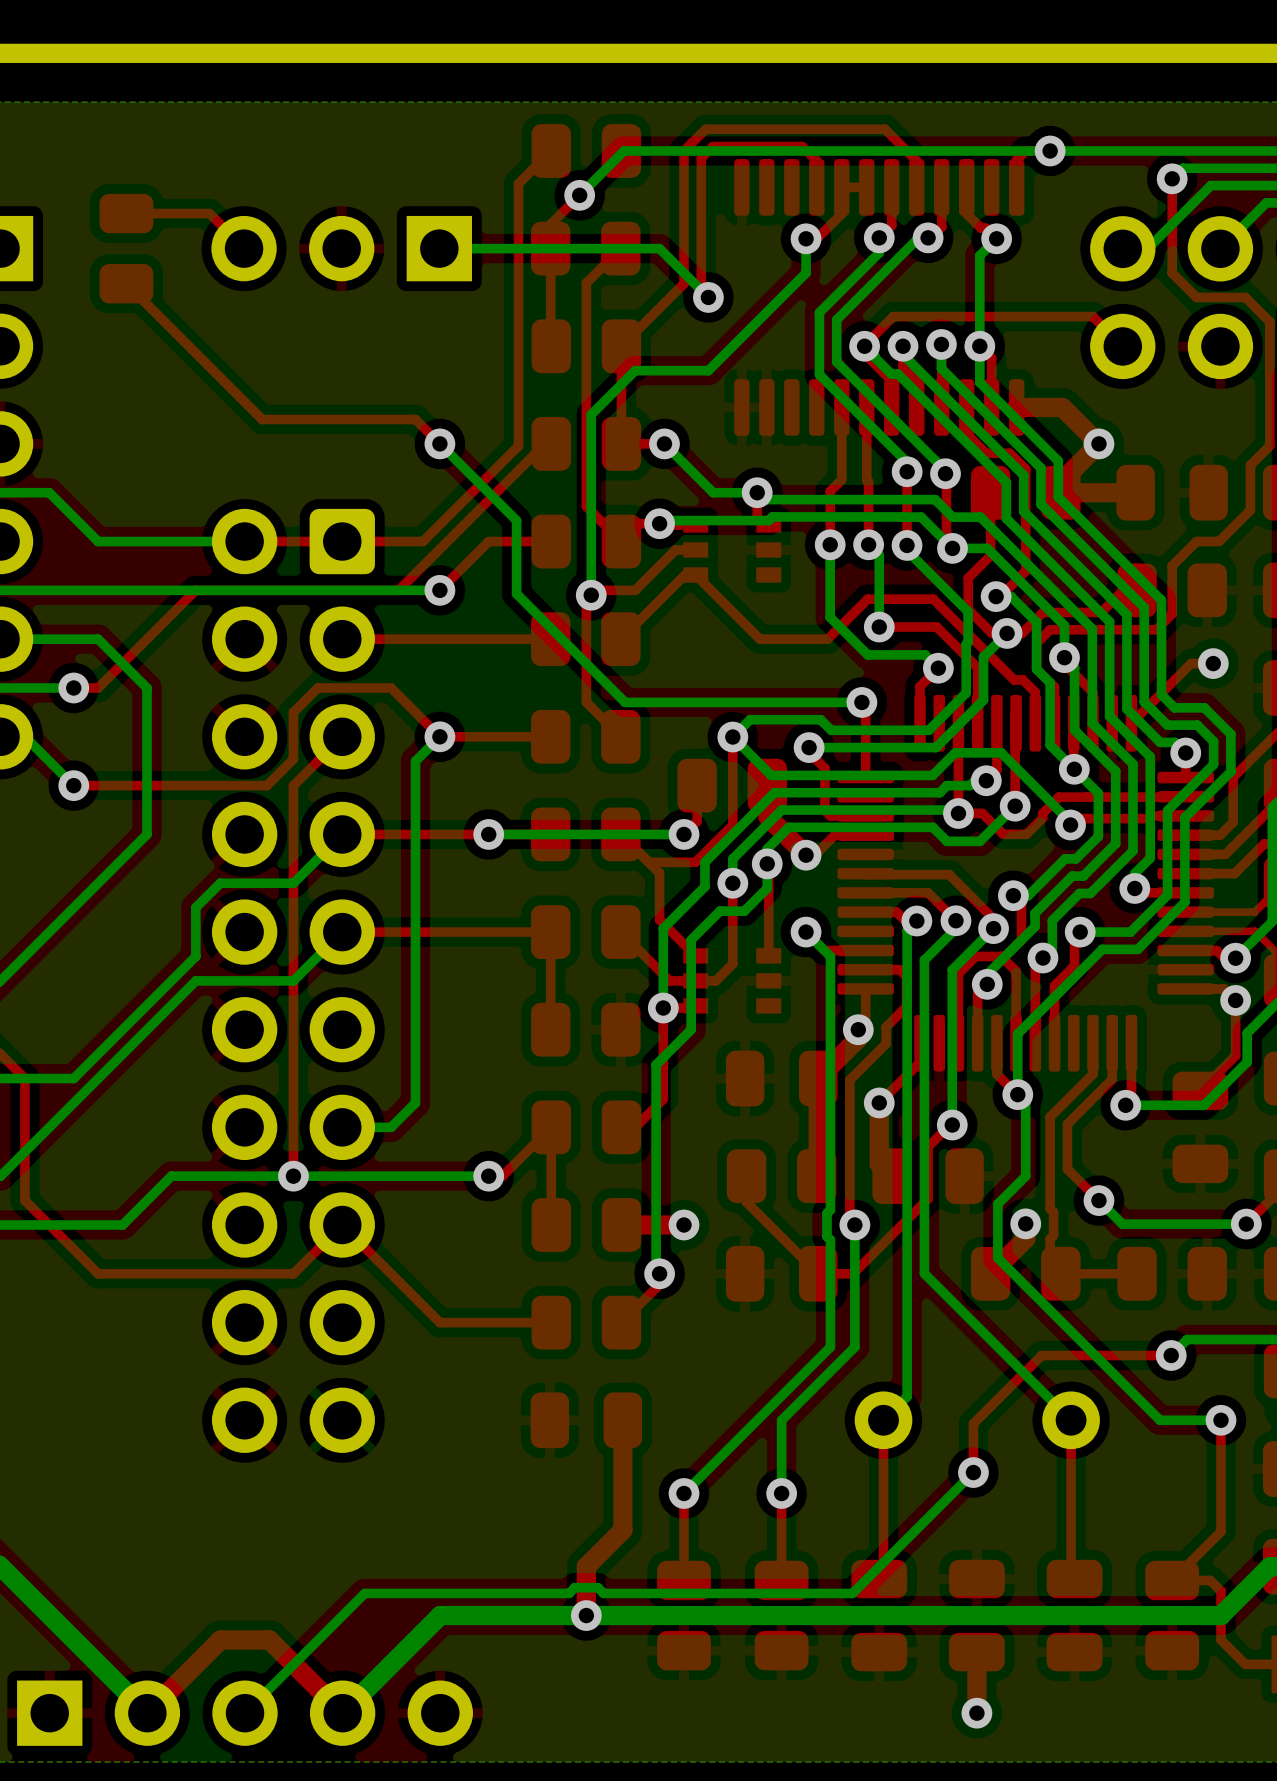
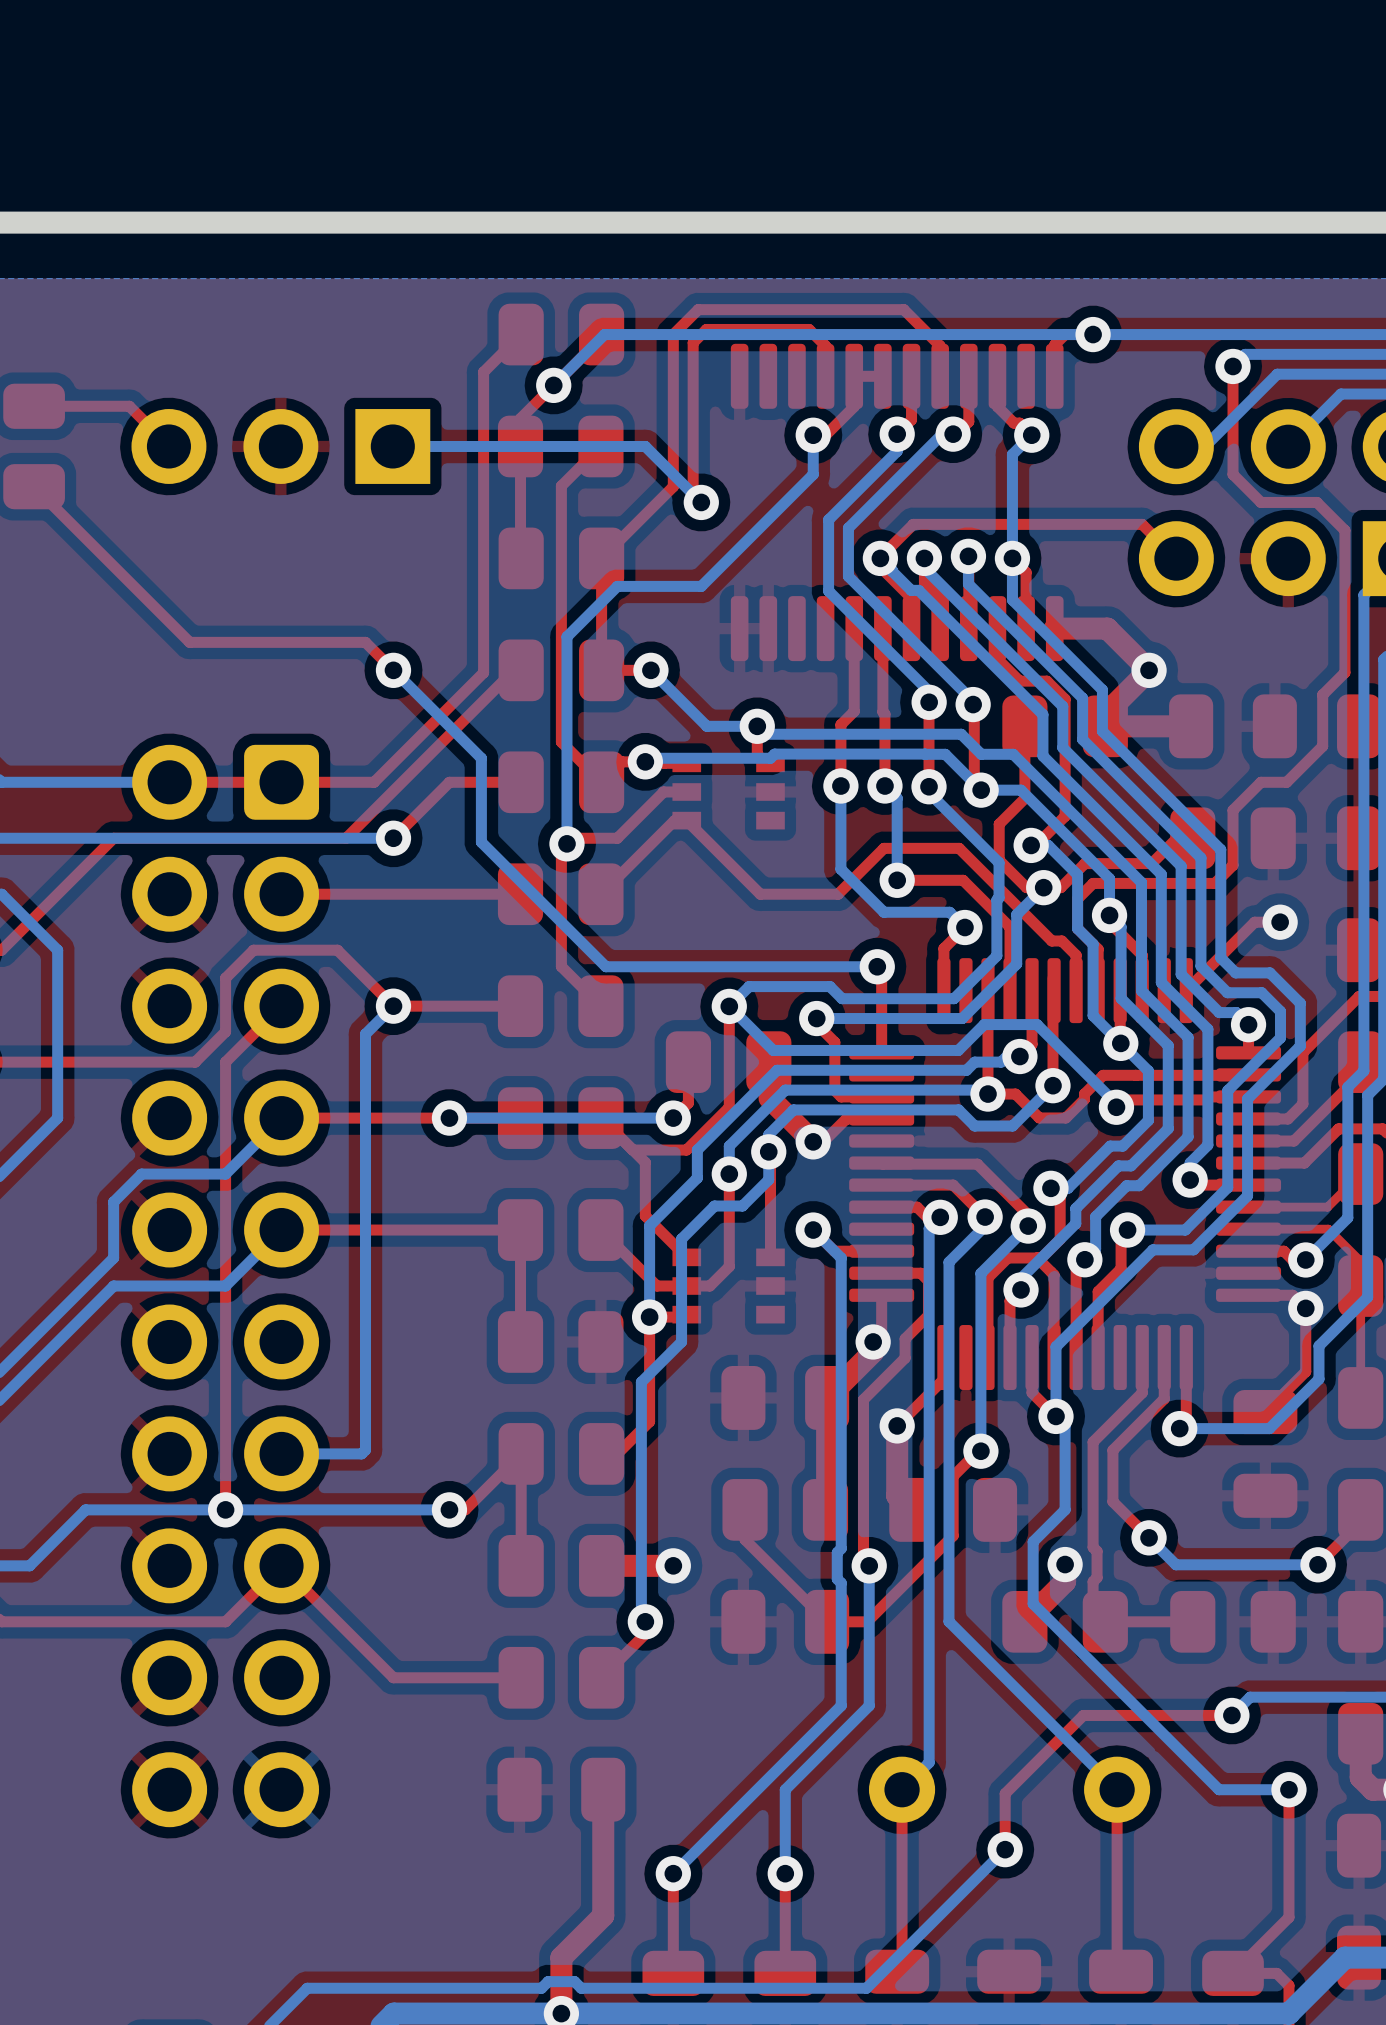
bottom track: (415, 1102) (391, 1127) -> (365, 1425) (365, 1449) (361, 1453) (337, 1453)

